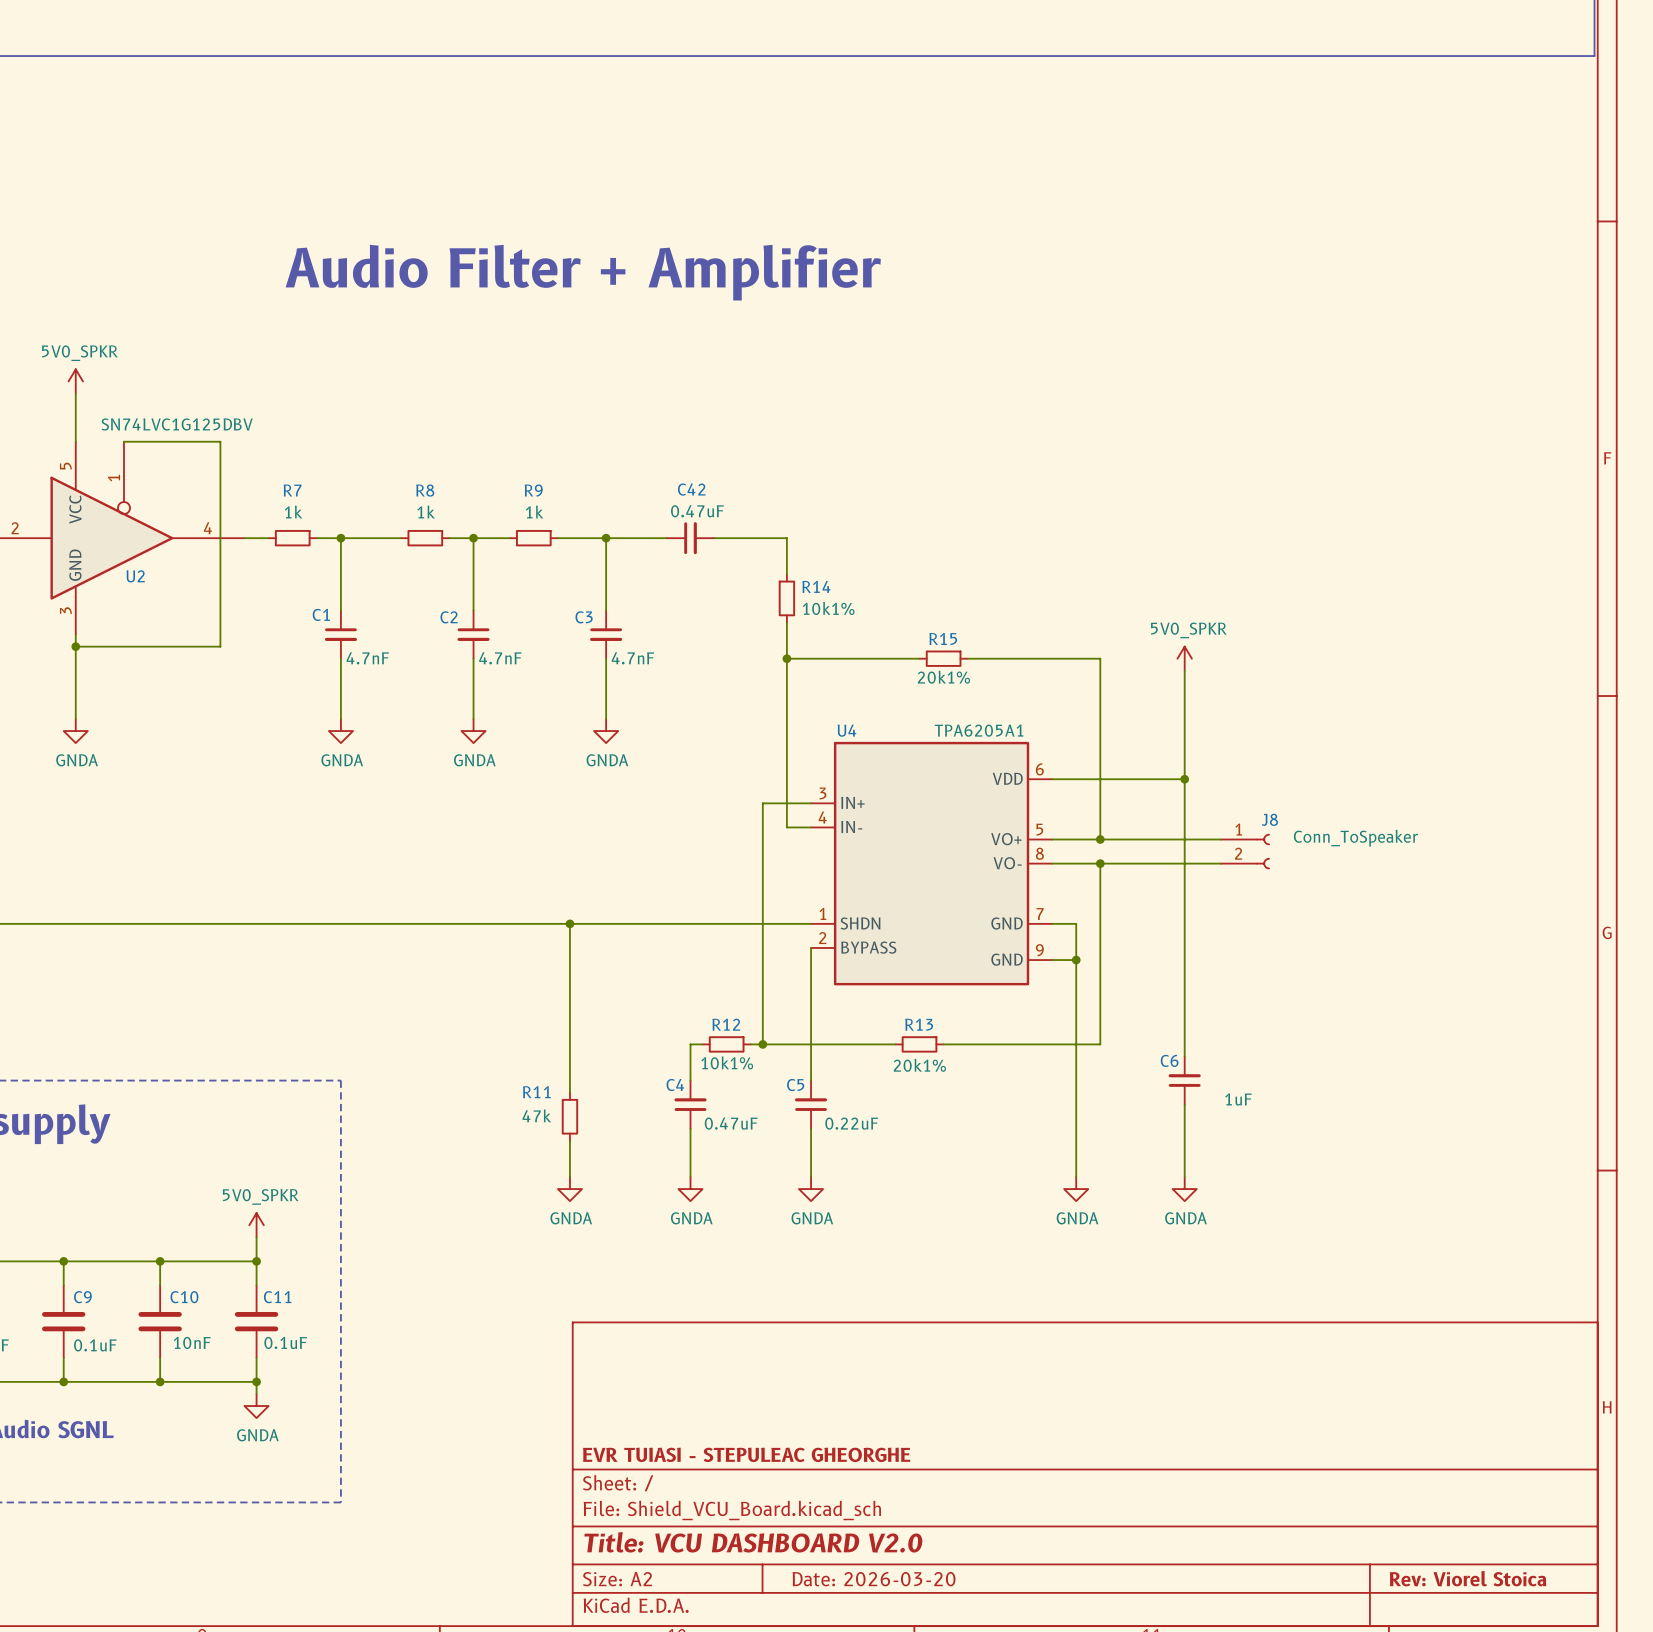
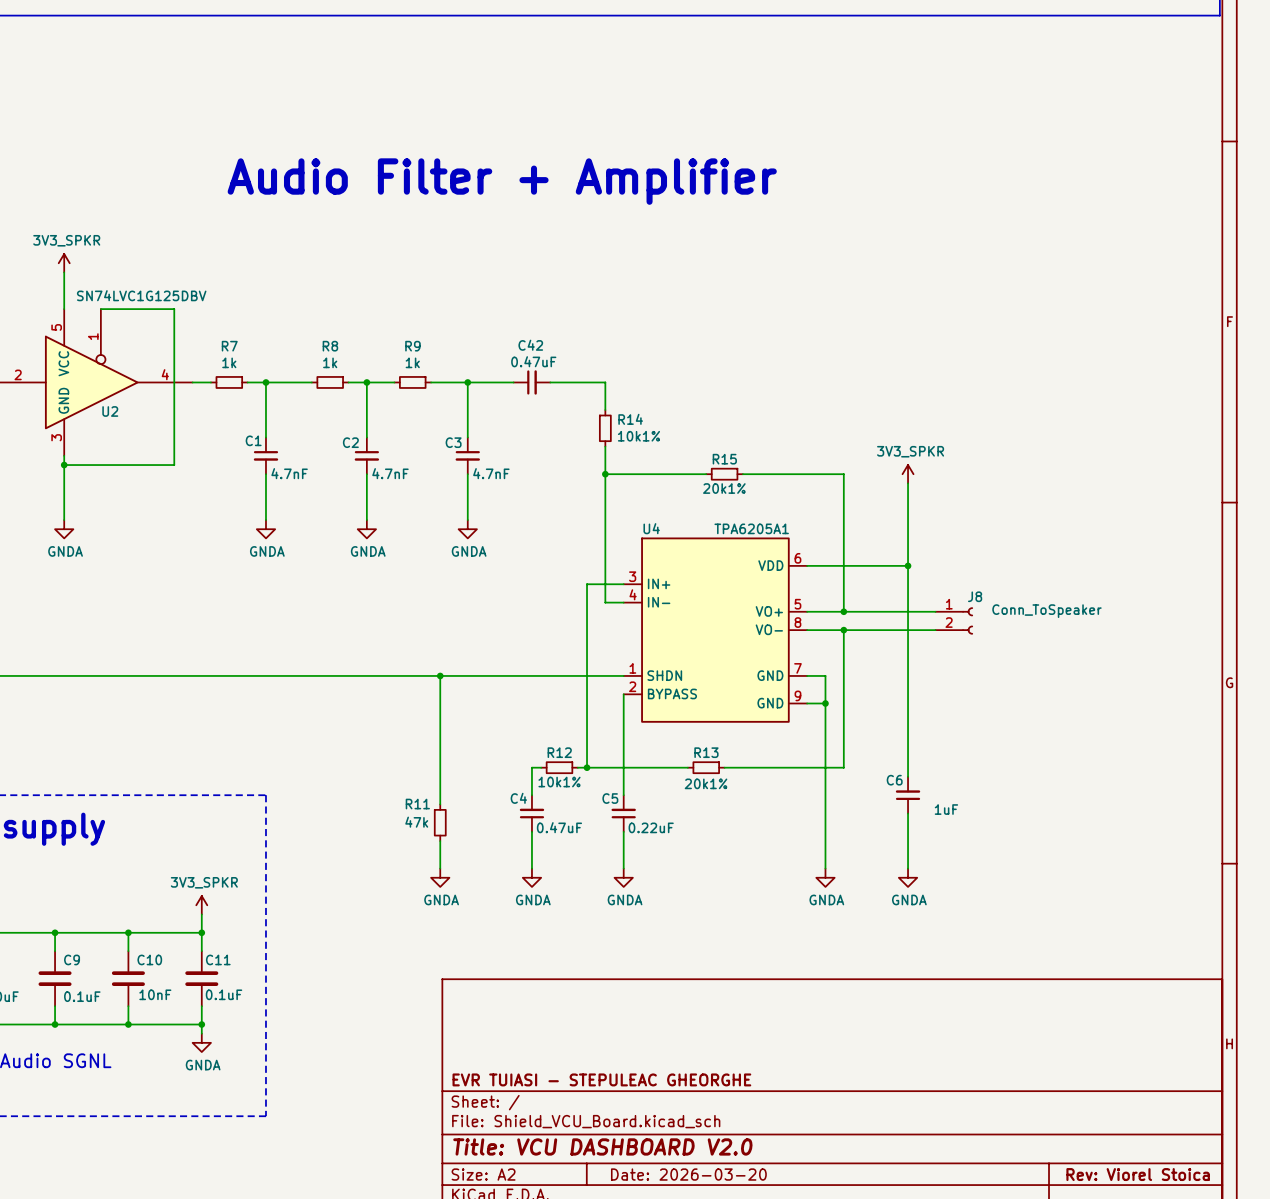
power symbol: 5V0_SPKR (75, 381) -> 3V3_SPKR (64, 263)
power symbol: 5V0_SPKR (1184, 658) -> 3V3_SPKR (908, 474)
power symbol: 5V0_SPKR (256, 1225) -> 3V3_SPKR (201, 905)

